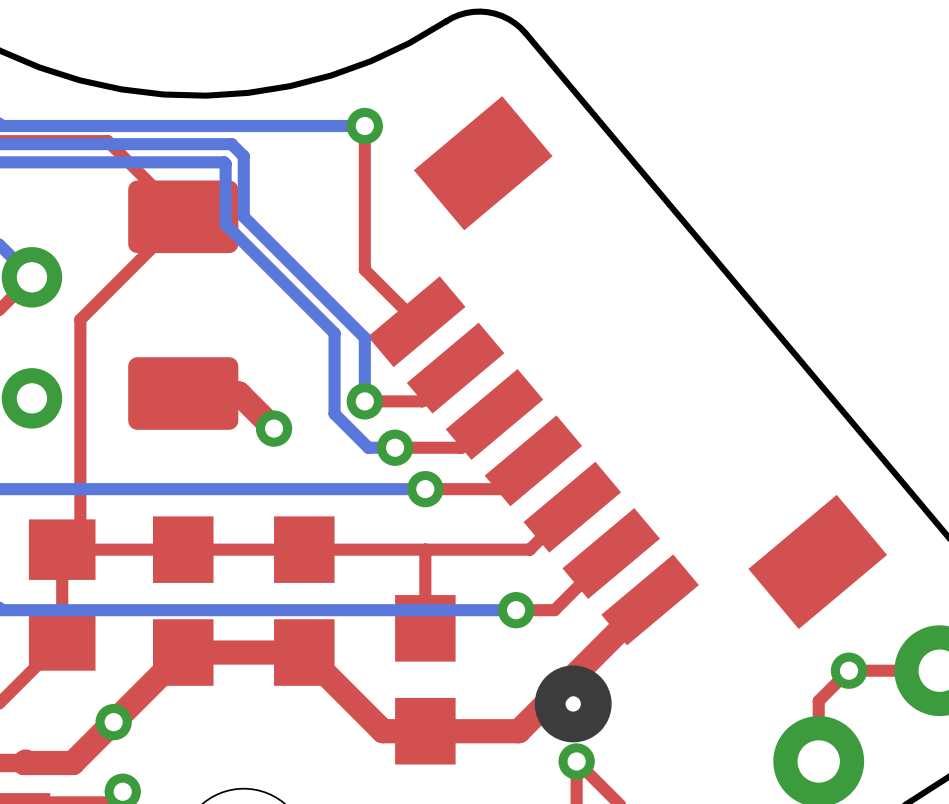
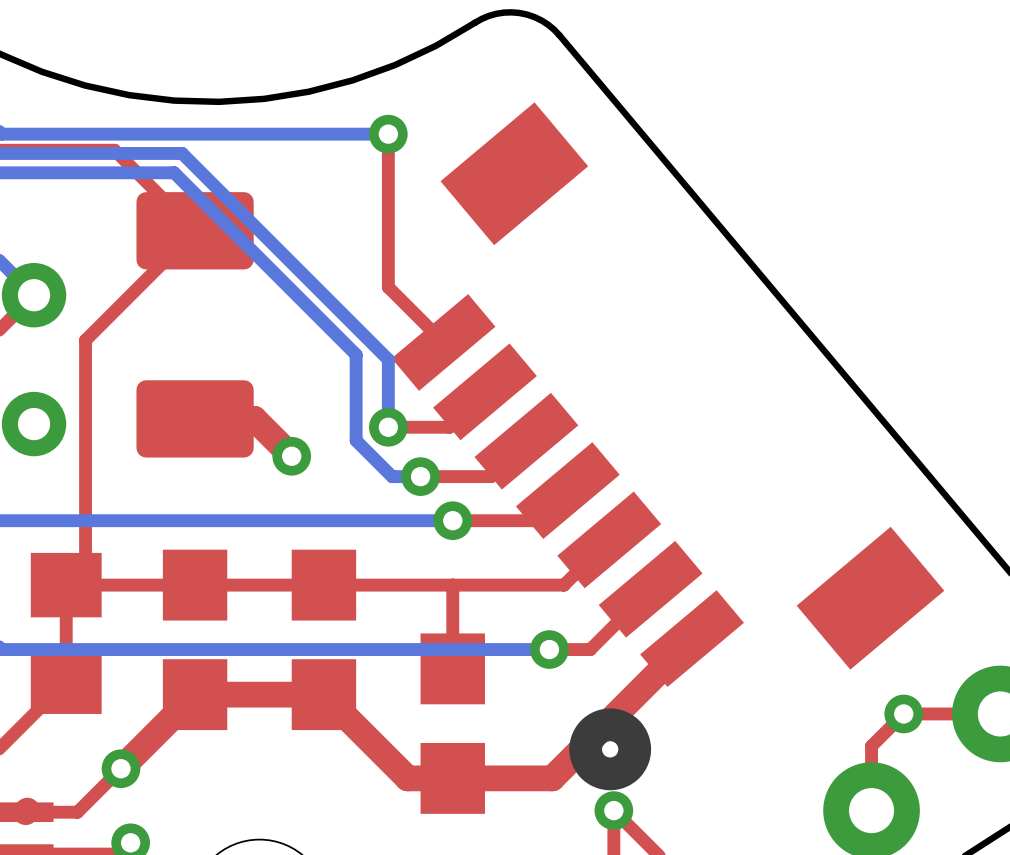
bottom track: (171, 144) (231, 144) (243, 156) (243, 216) -> (182, 153) (259, 230)
bottom track: (163, 162) (224, 162) (225, 224) -> (174, 172) (240, 238)
top track width: thick (113, 722) (72, 762) (24, 762) -> thin (120, 768) (77, 812) (25, 812)

